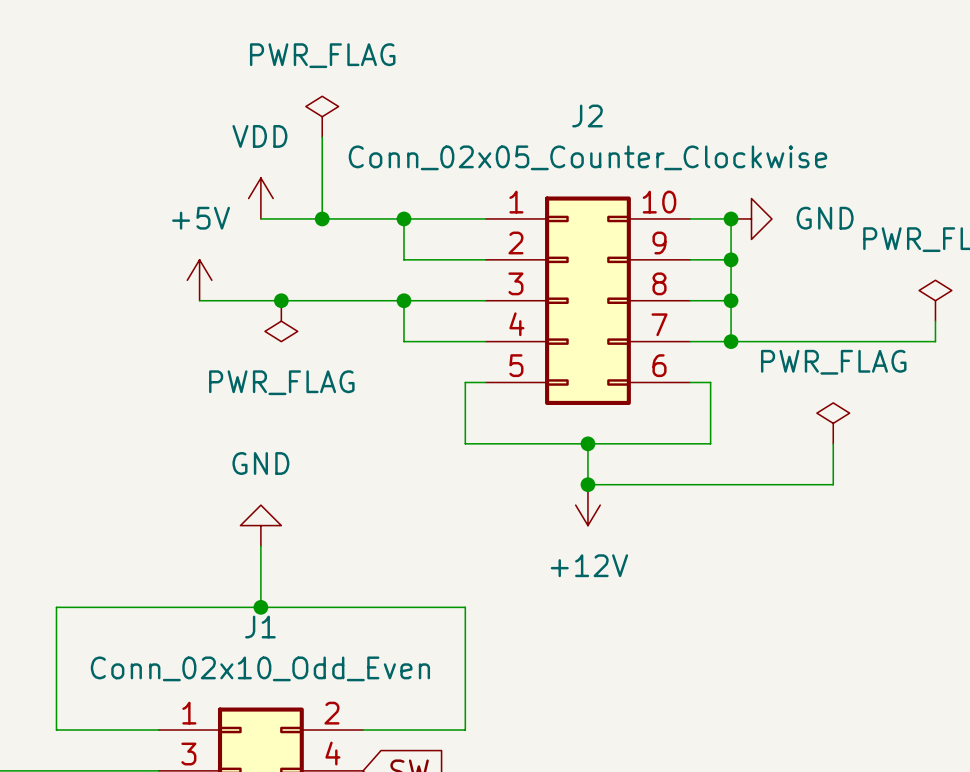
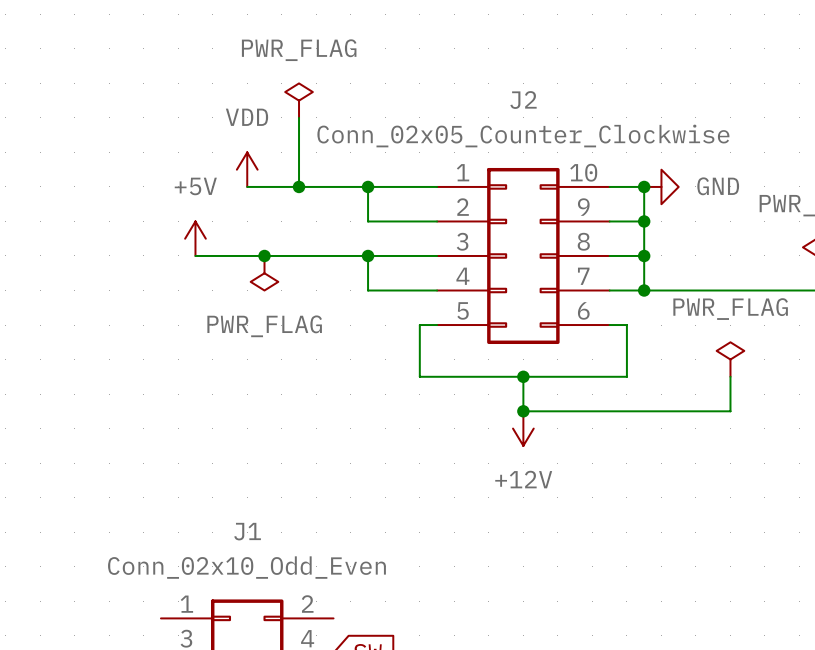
power symbol: GND (260, 525) -> none
wire: (260, 546) (260, 607) -> none
junction: (260, 607) -> none
wire: (158, 730) (56, 730) (56, 607) (465, 607) (465, 730) (363, 730) -> none

